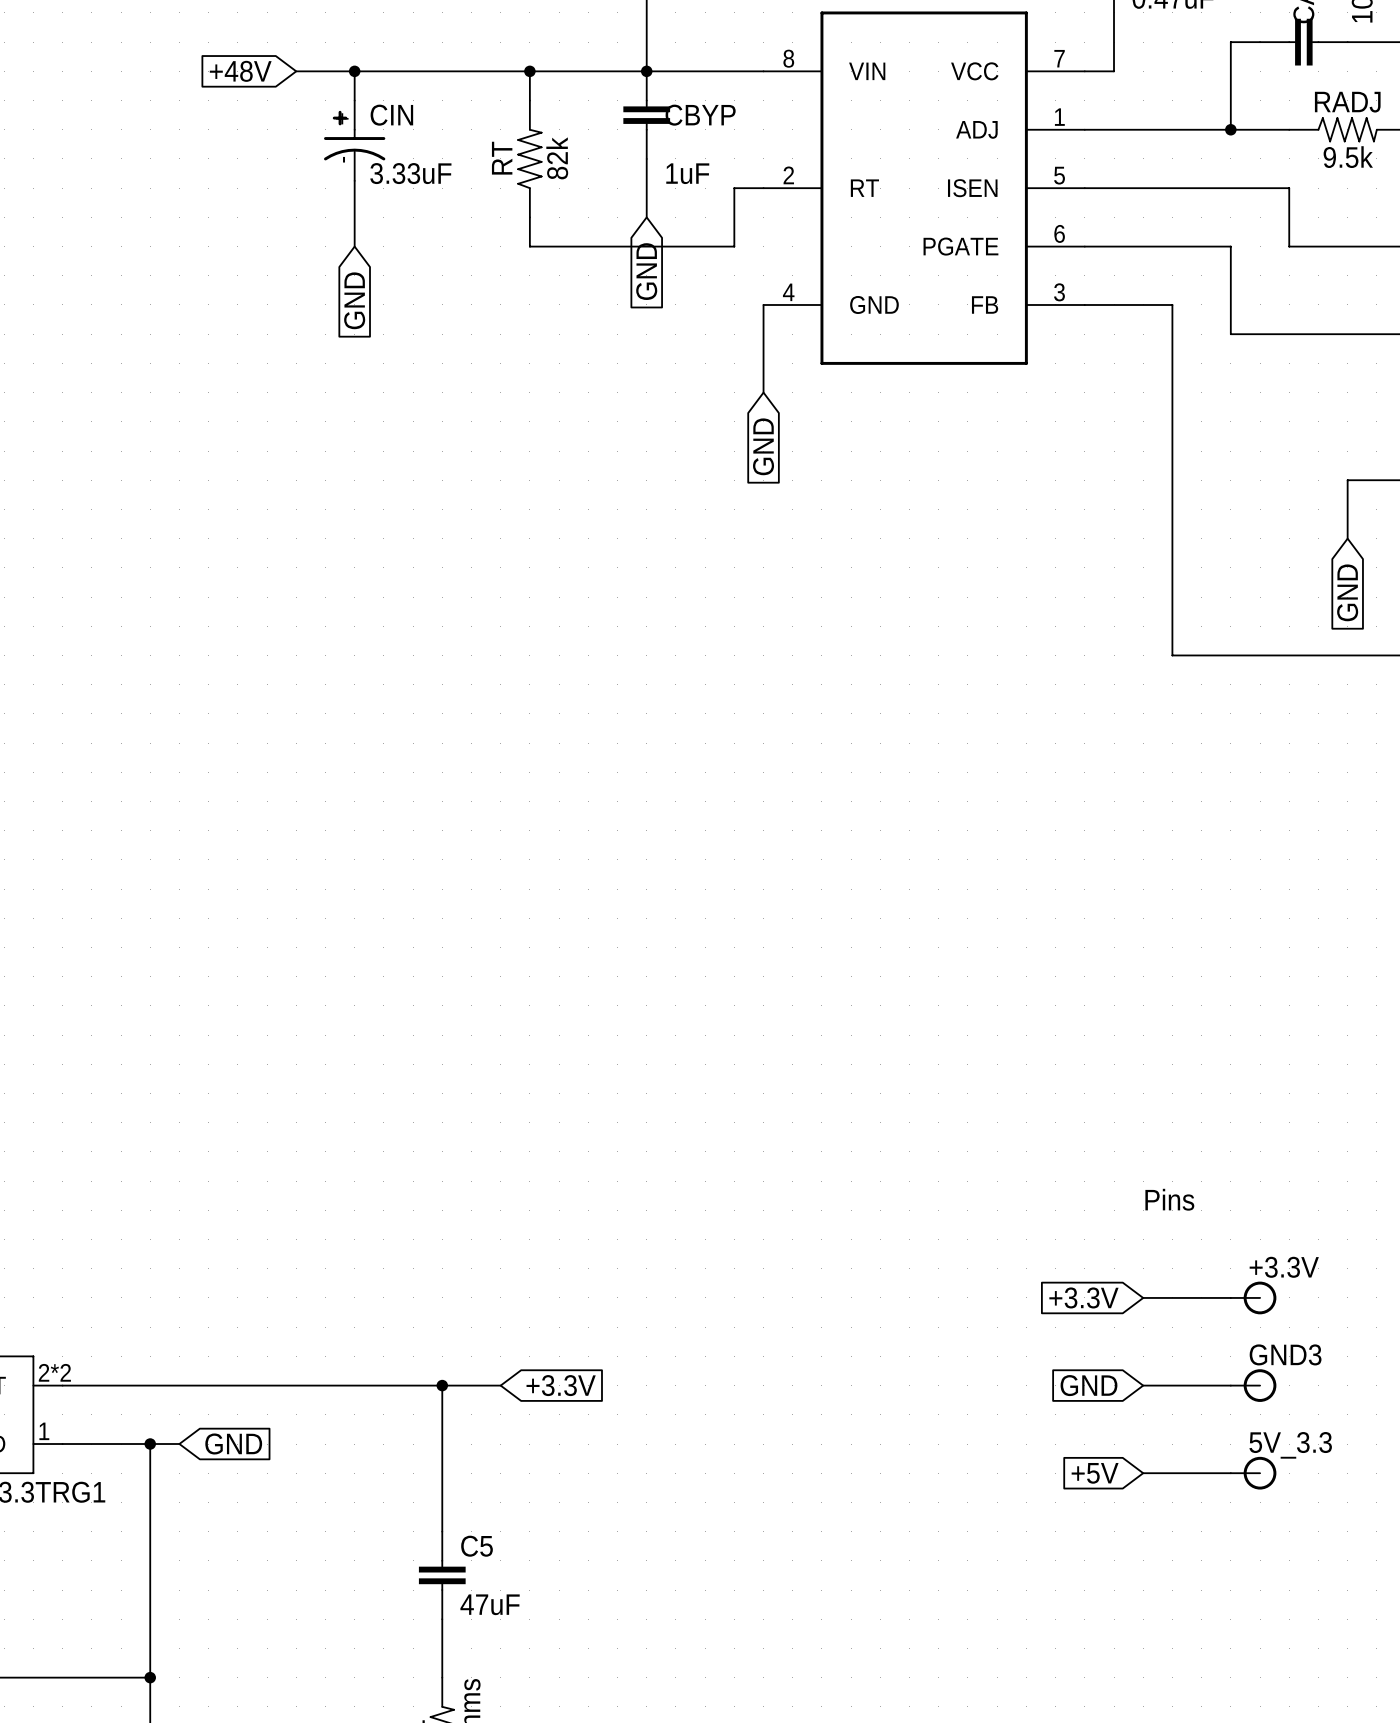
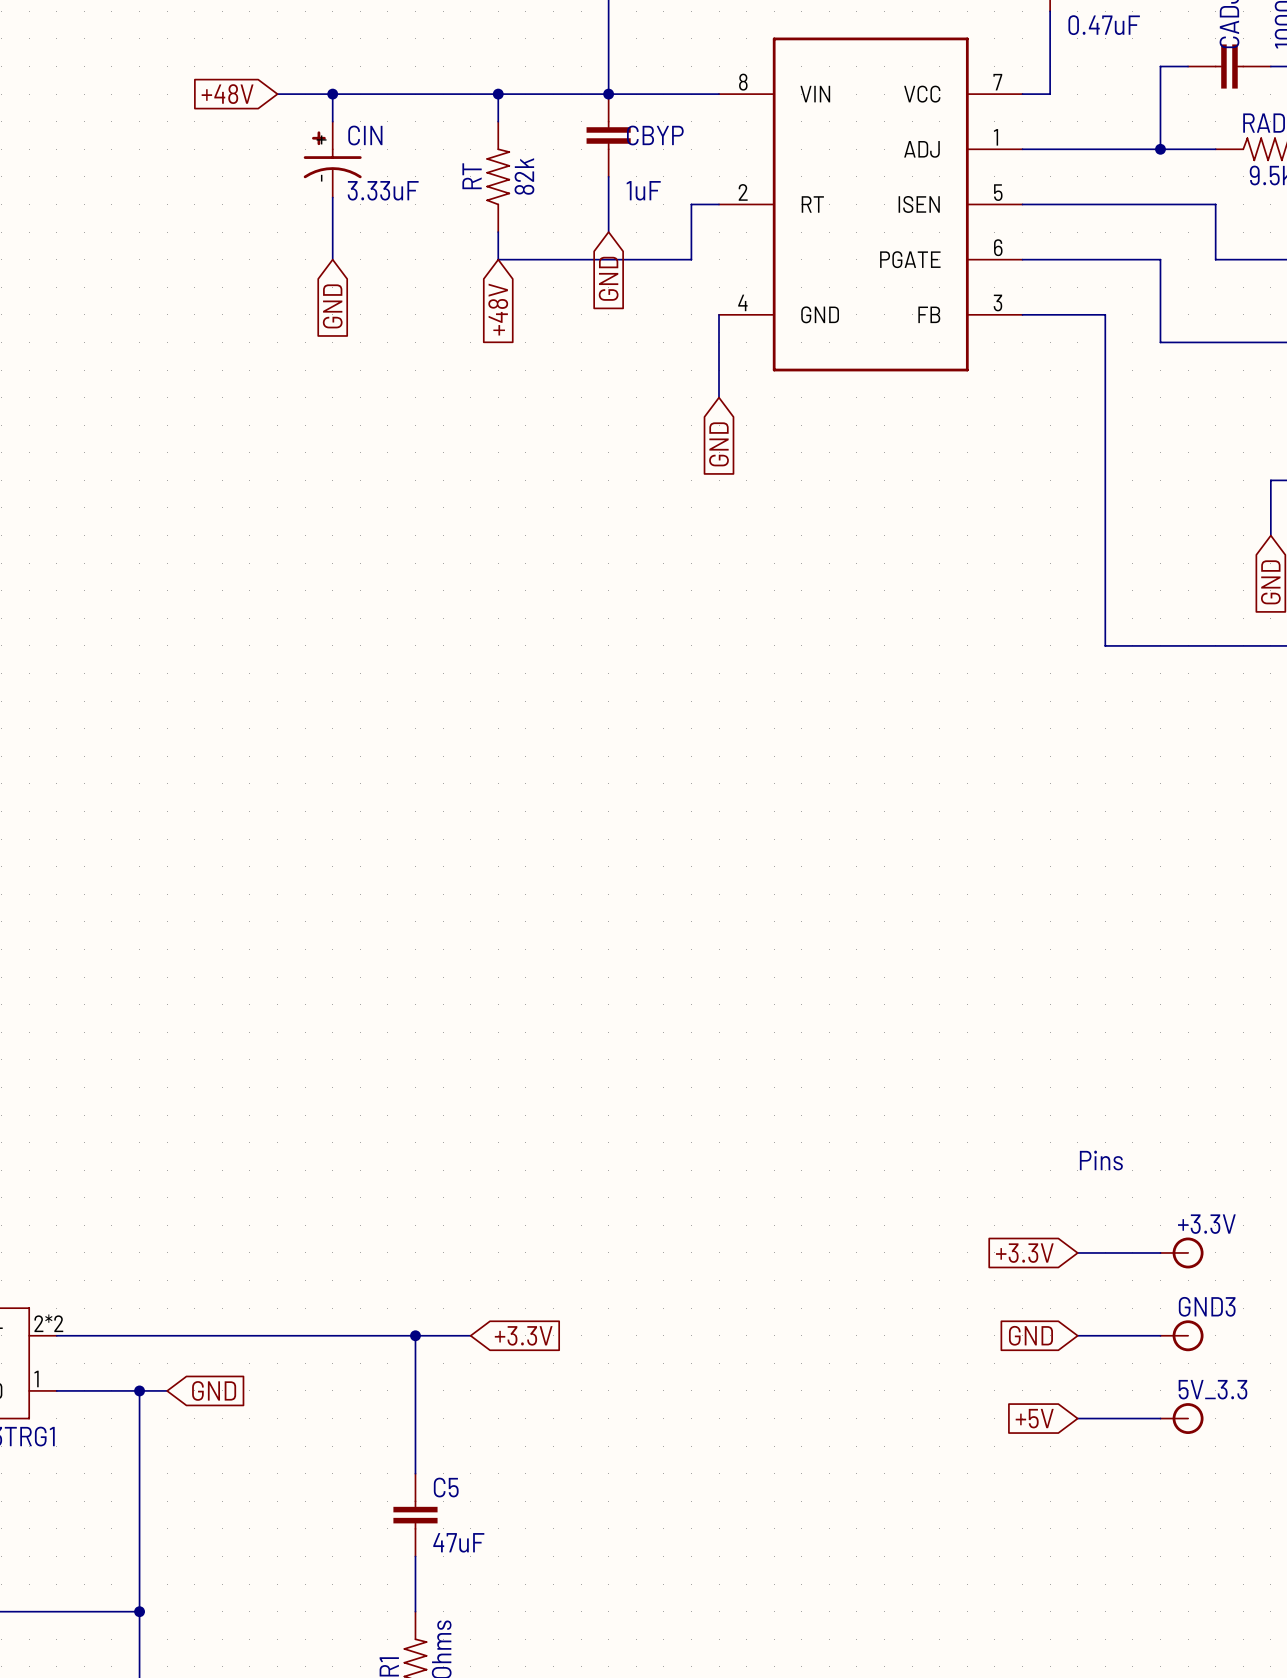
global label: none -> +48V (498, 309)

